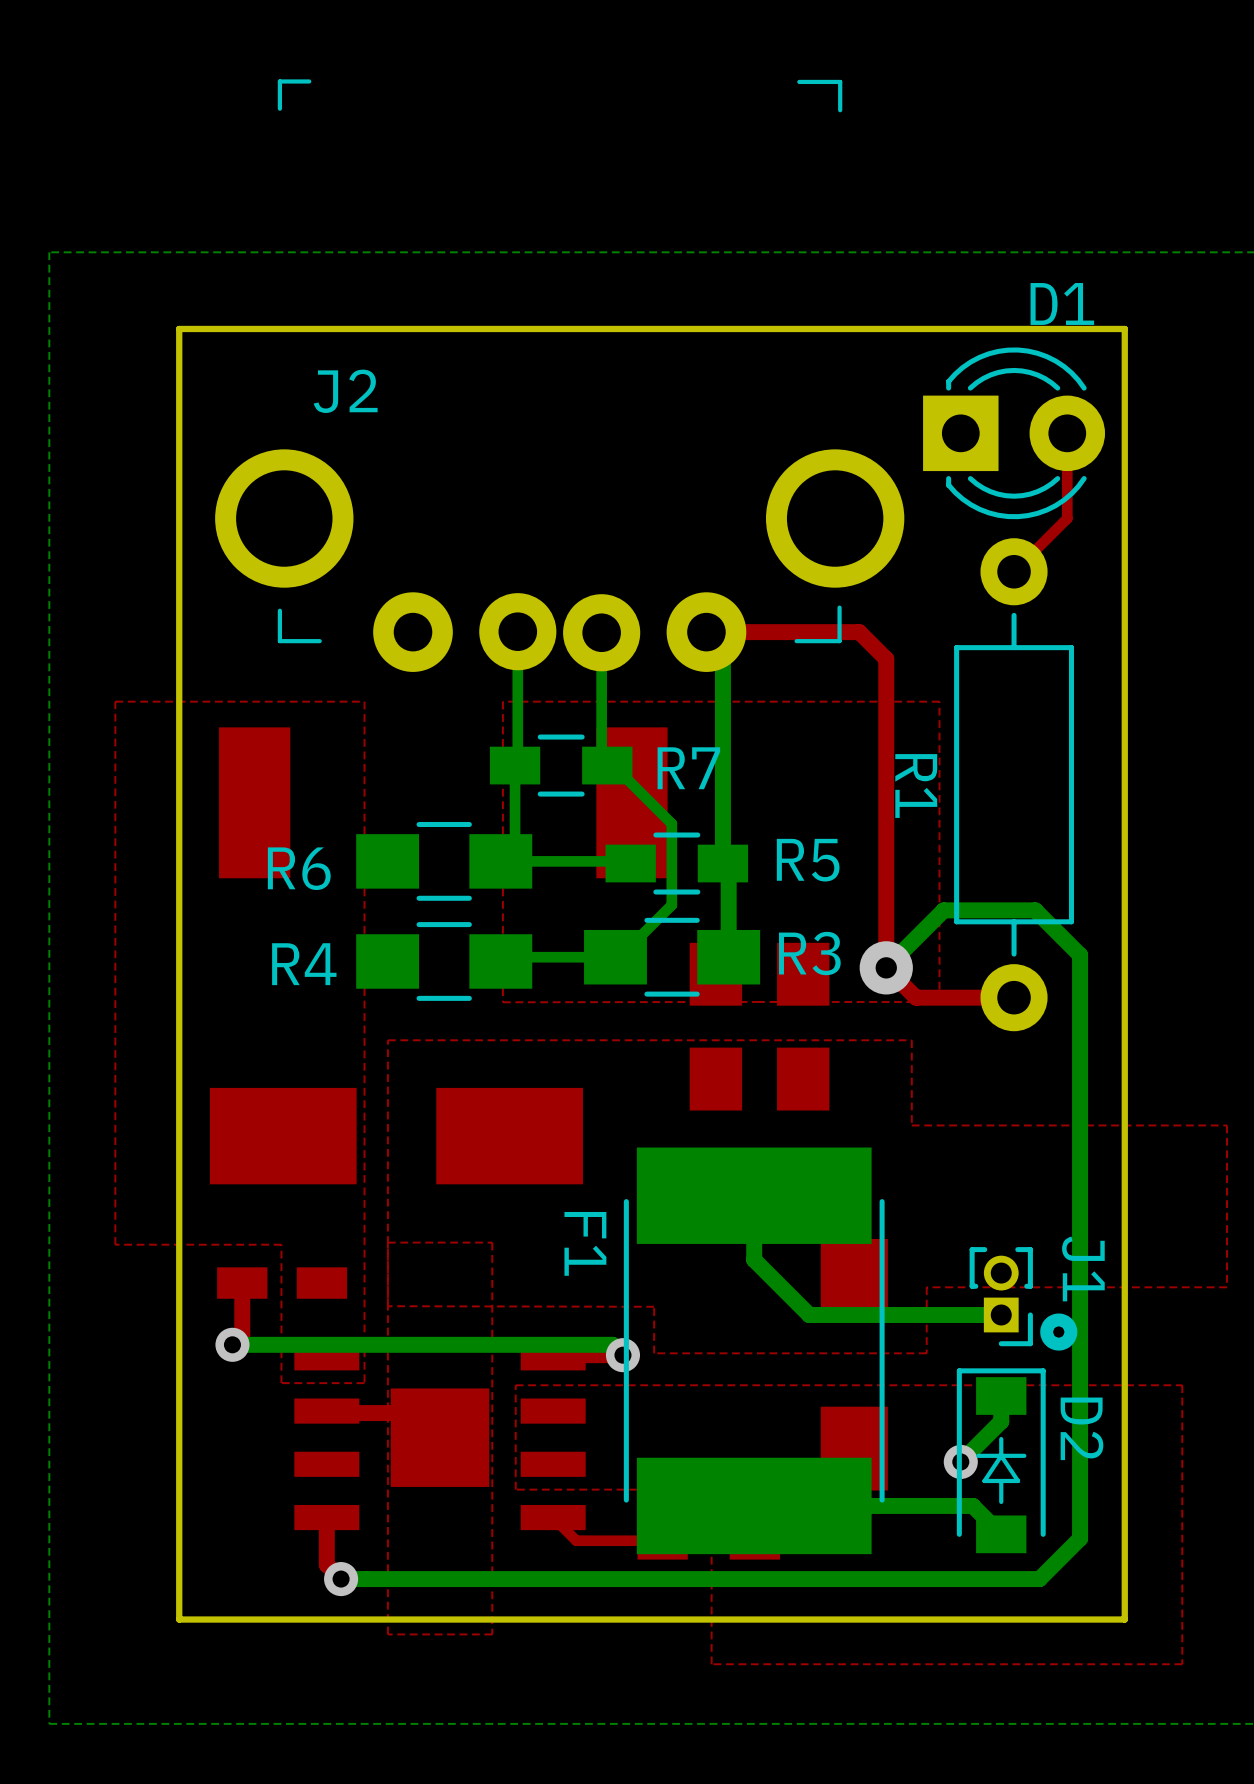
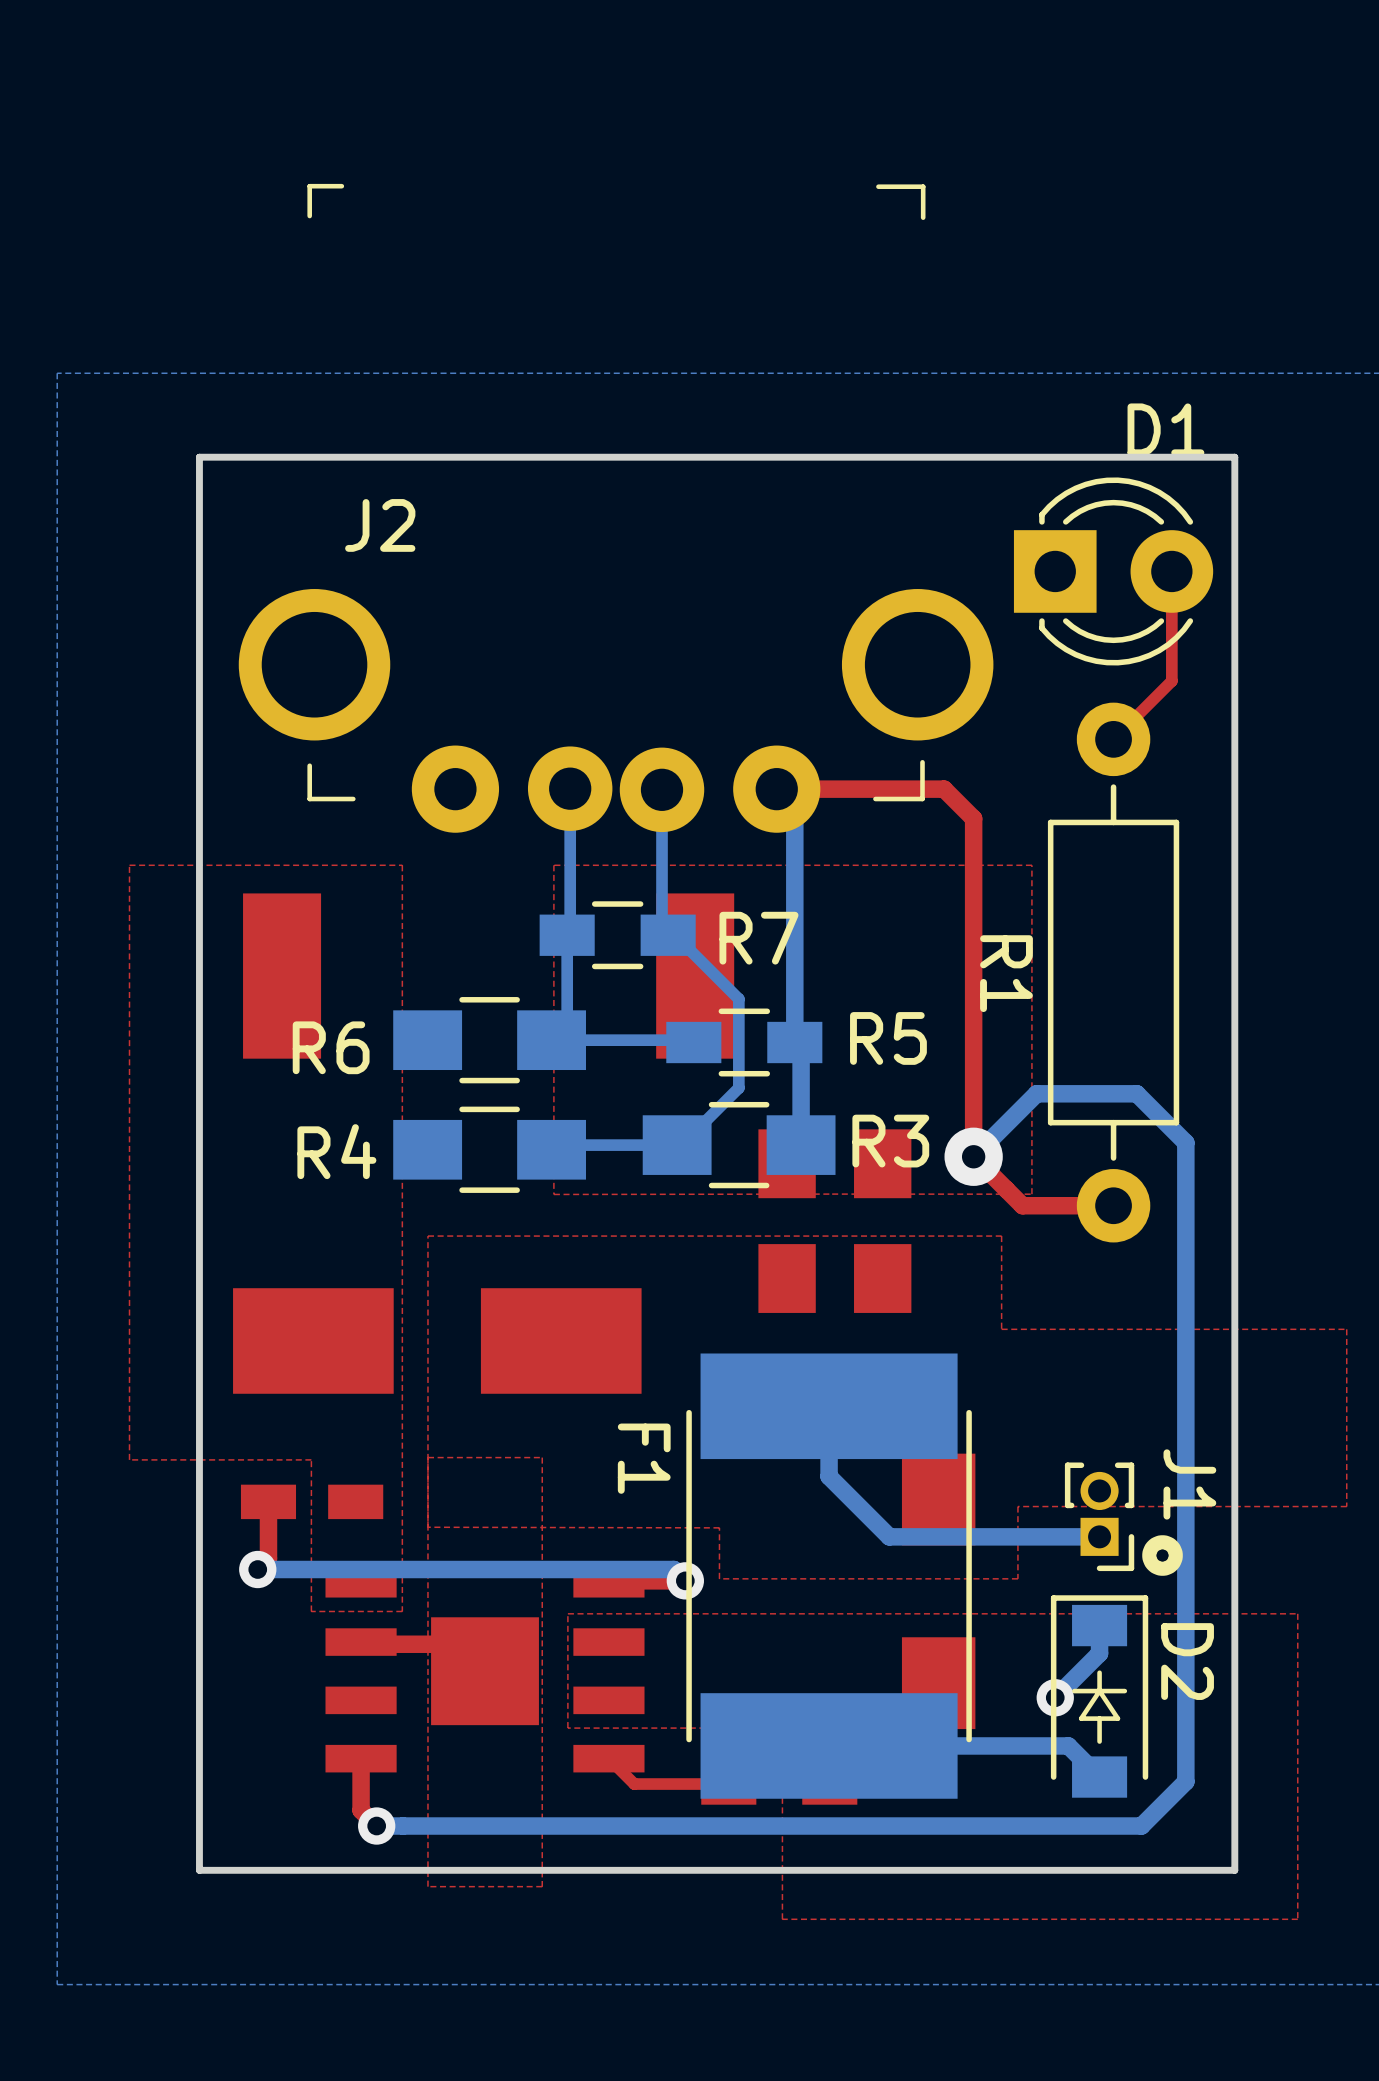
top track: (1067, 518) (1014, 571) -> (1171, 664) (1171, 681) (1113, 739)
R1 position: (1014, 784) -> (1113, 972)
top track: (1014, 997) (916, 997) -> (1113, 1205) (1022, 1205) (1006, 1189)

